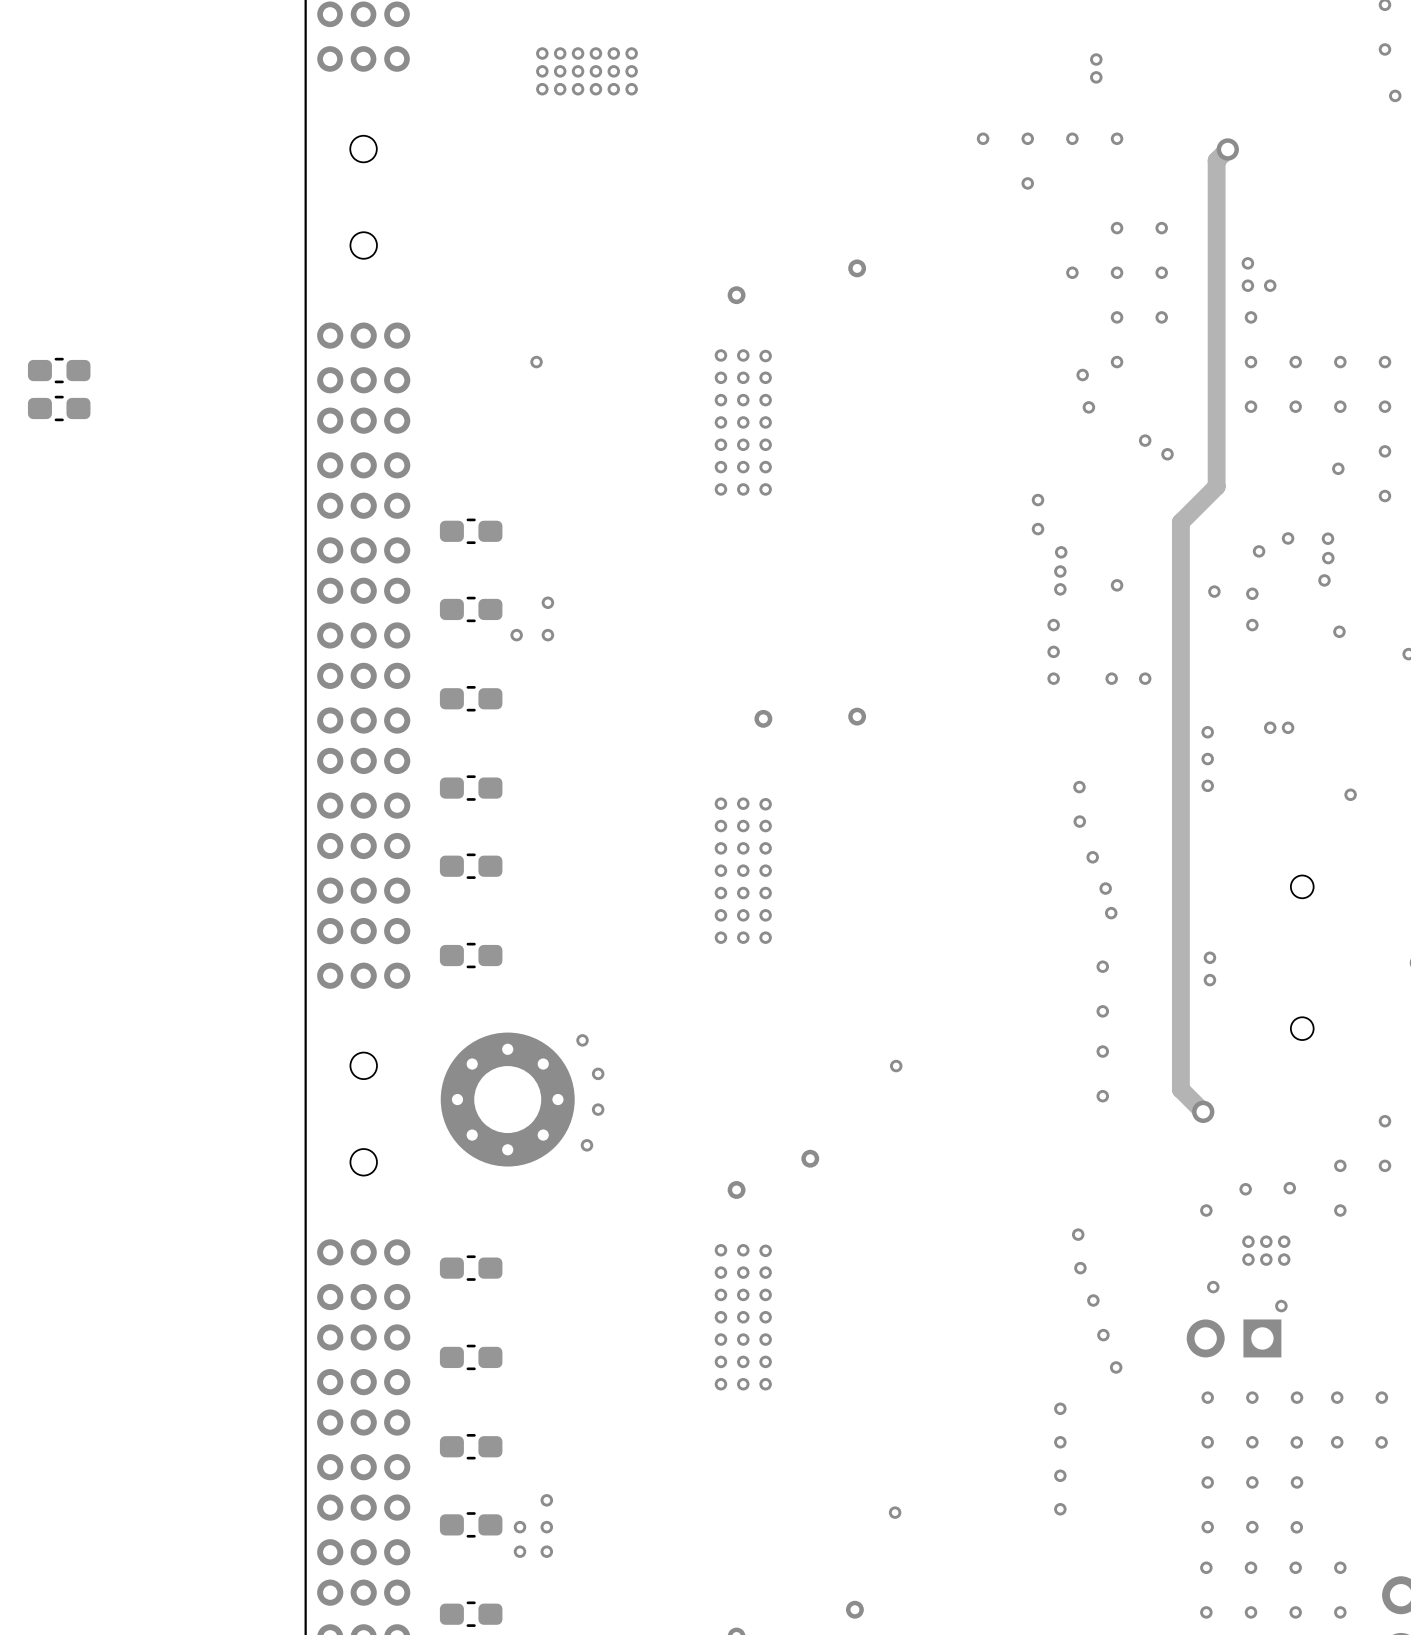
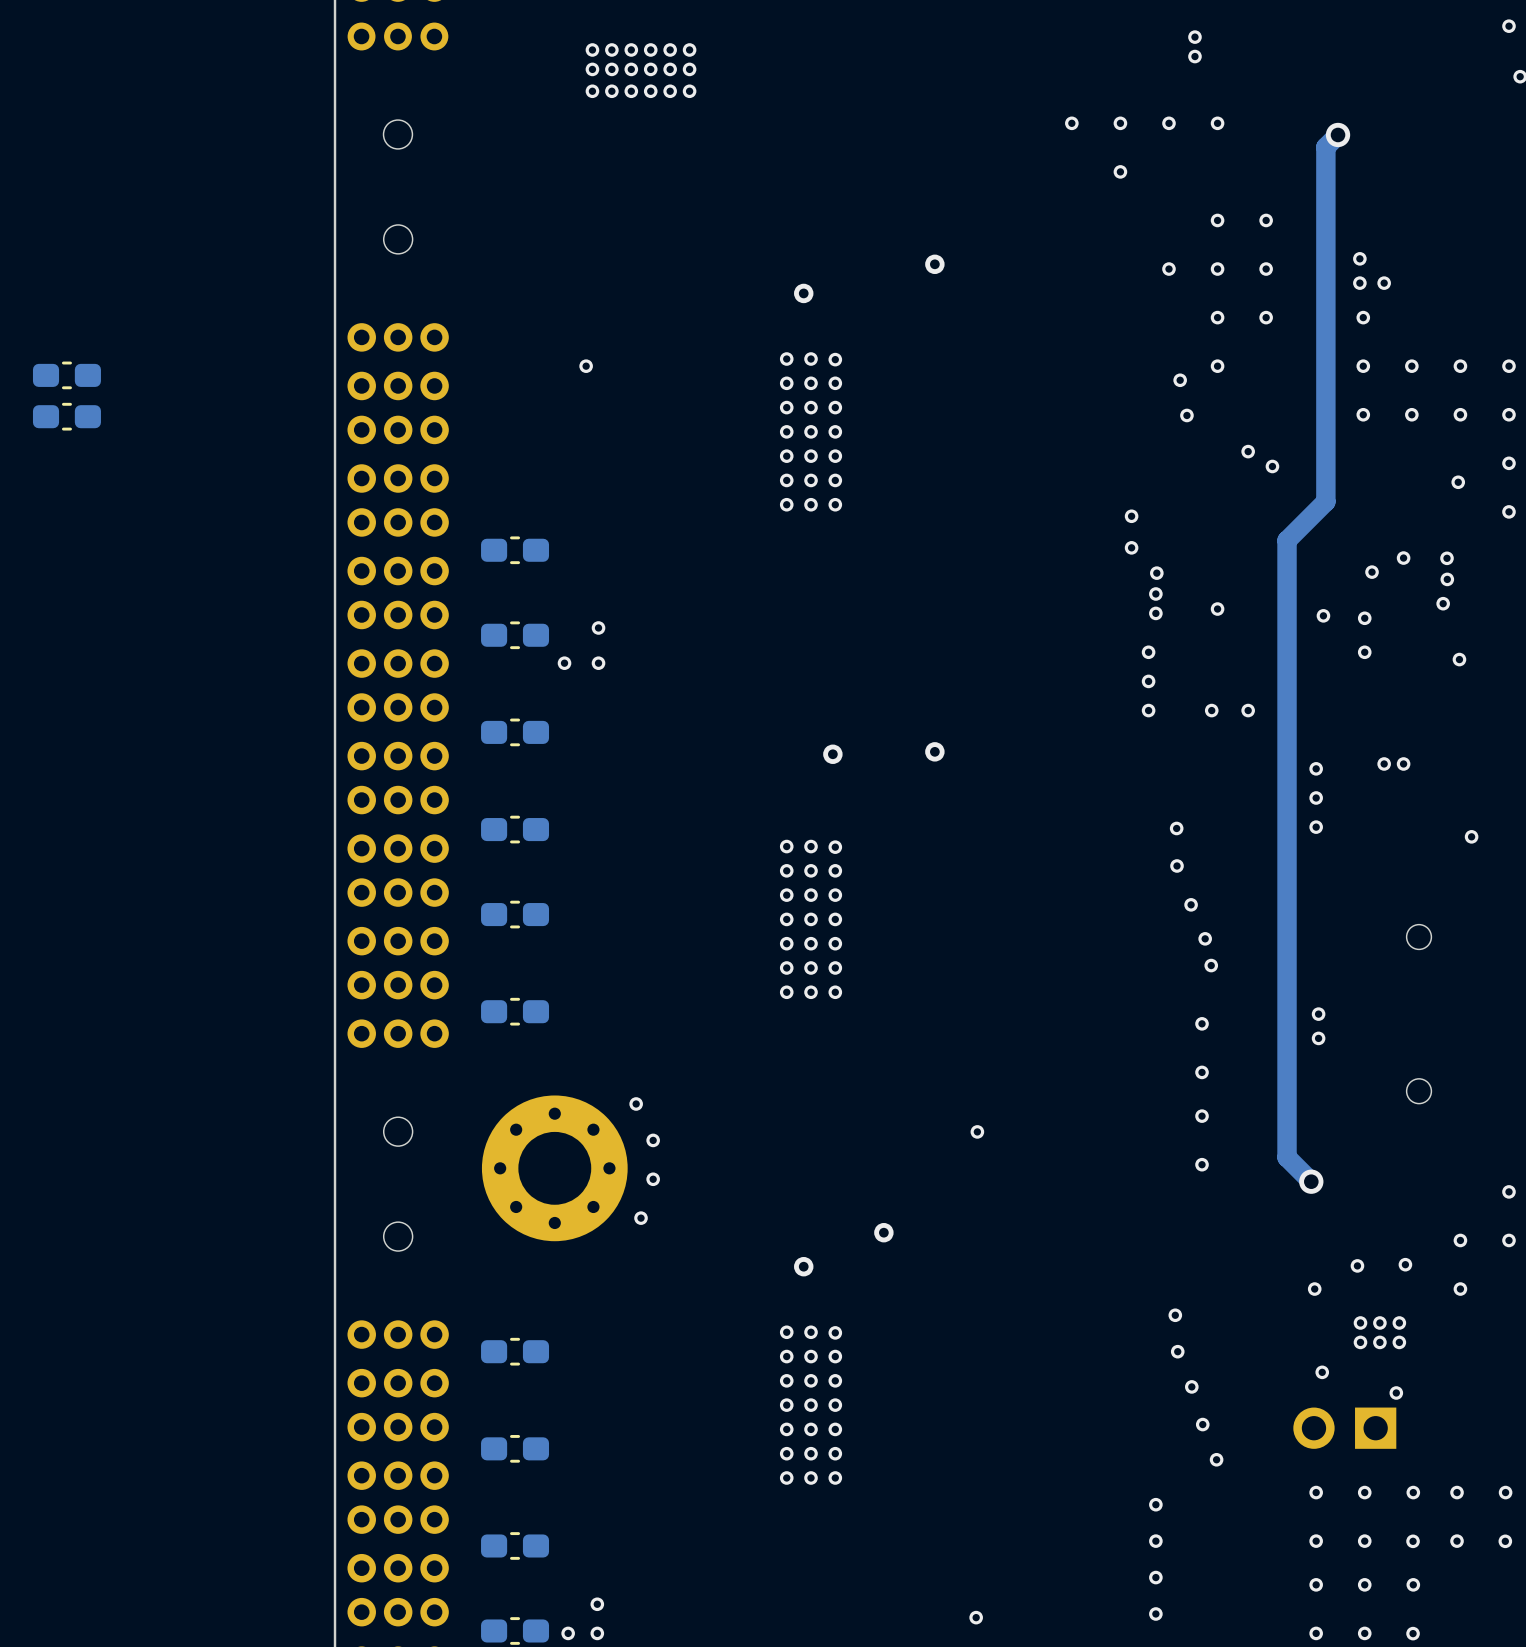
via: (542, 53) -> none
via: (560, 53) -> none
via: (578, 53) -> none
via: (595, 53) -> none
via: (613, 53) -> none
via: (631, 53) -> none
via: none -> (592, 91)
via: none -> (611, 91)
via: none -> (631, 91)
via: none -> (650, 91)
via: none -> (670, 91)
via: none -> (689, 91)

